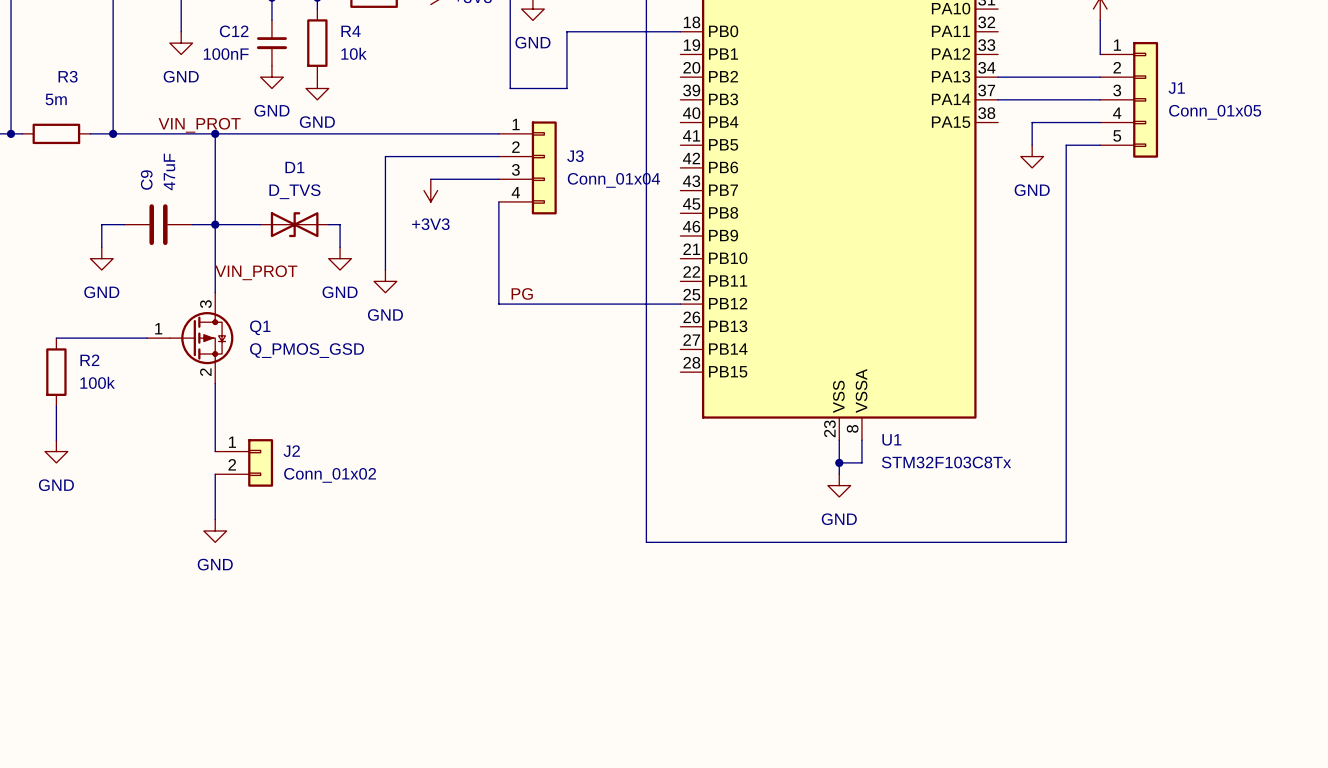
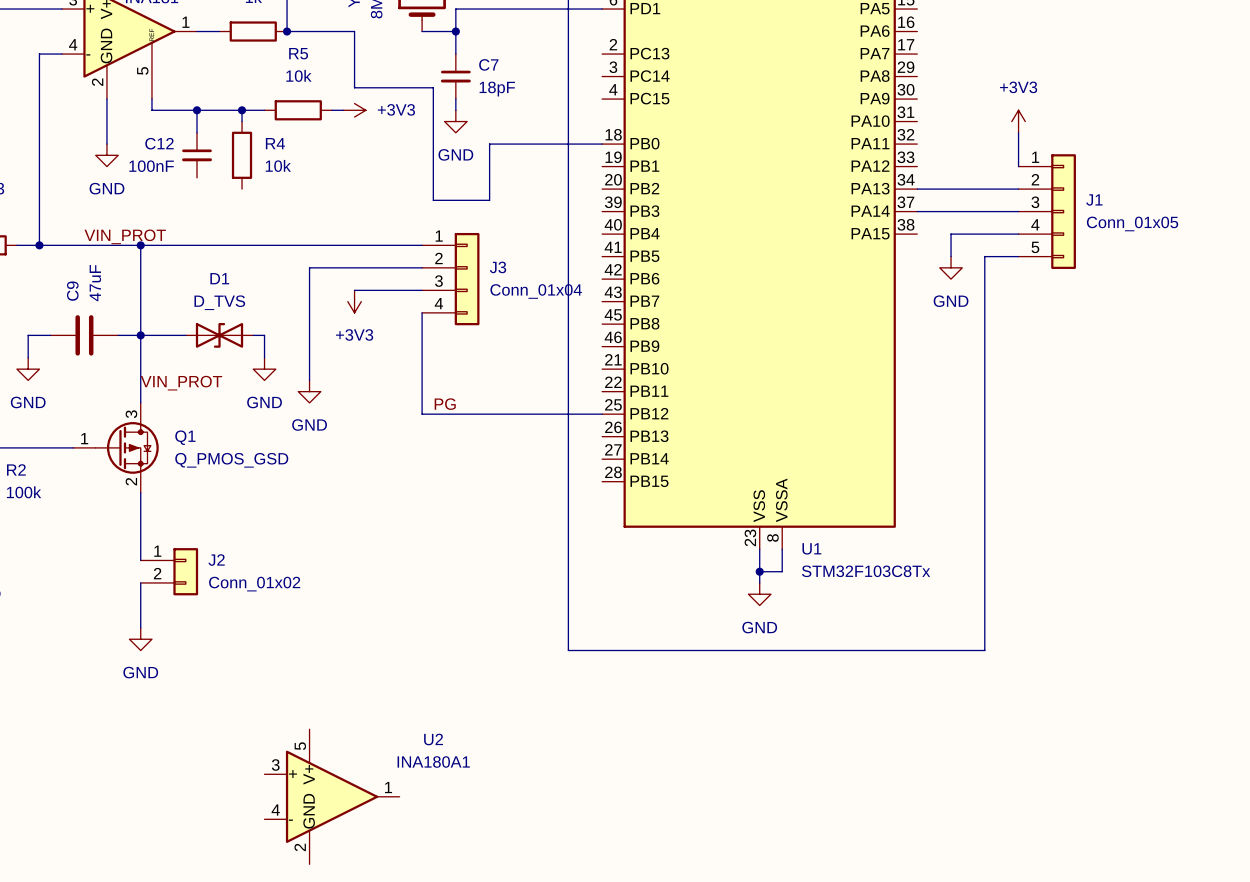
power symbol: GND (271, 77) -> none
power symbol: GND (317, 88) -> none
U2: none -> INA180A1 (332, 796)

